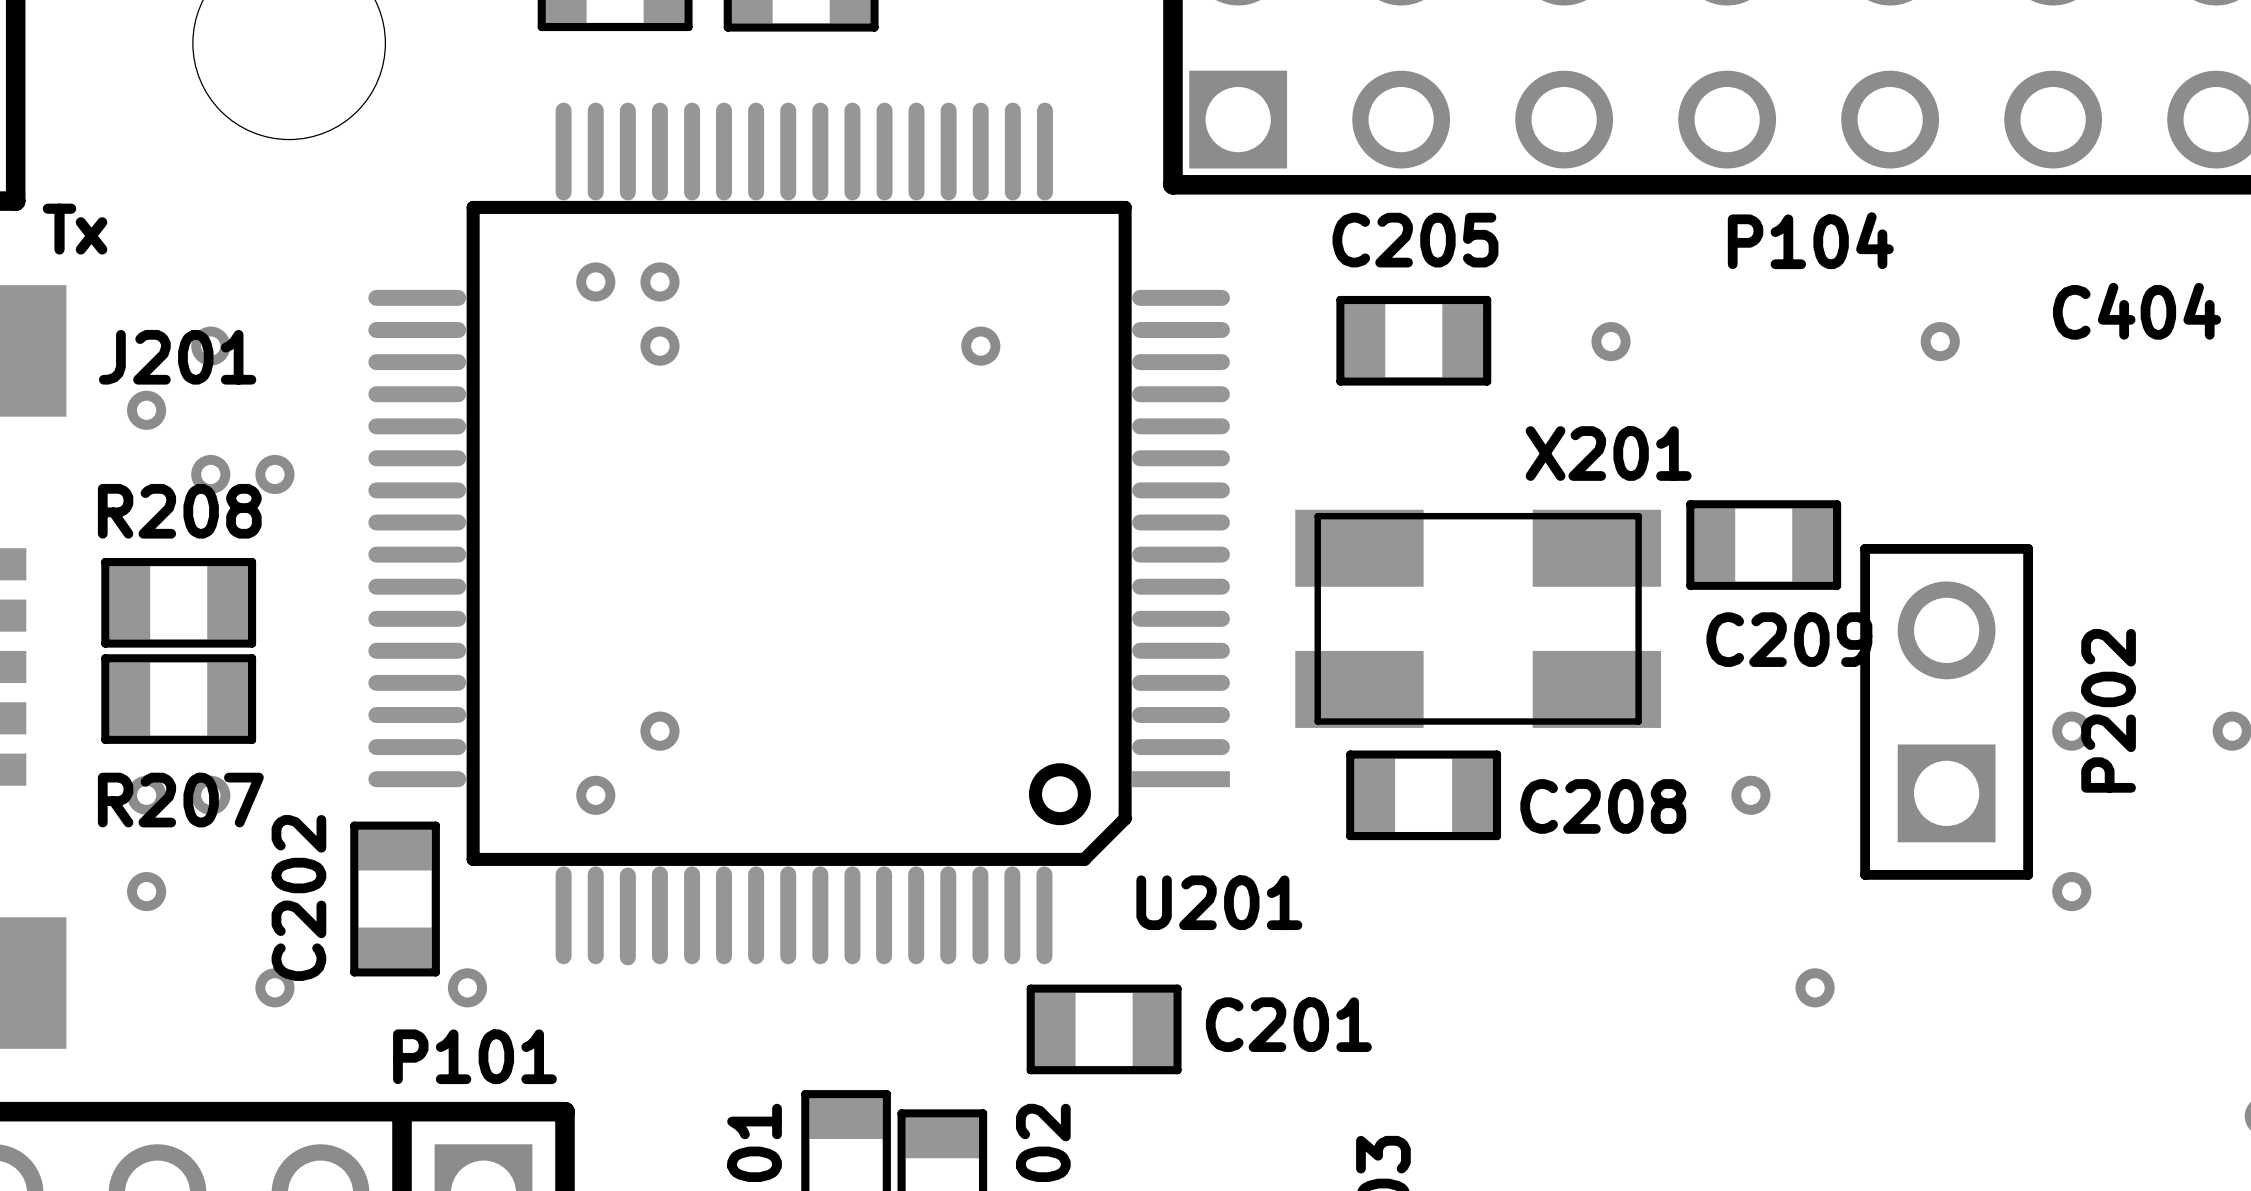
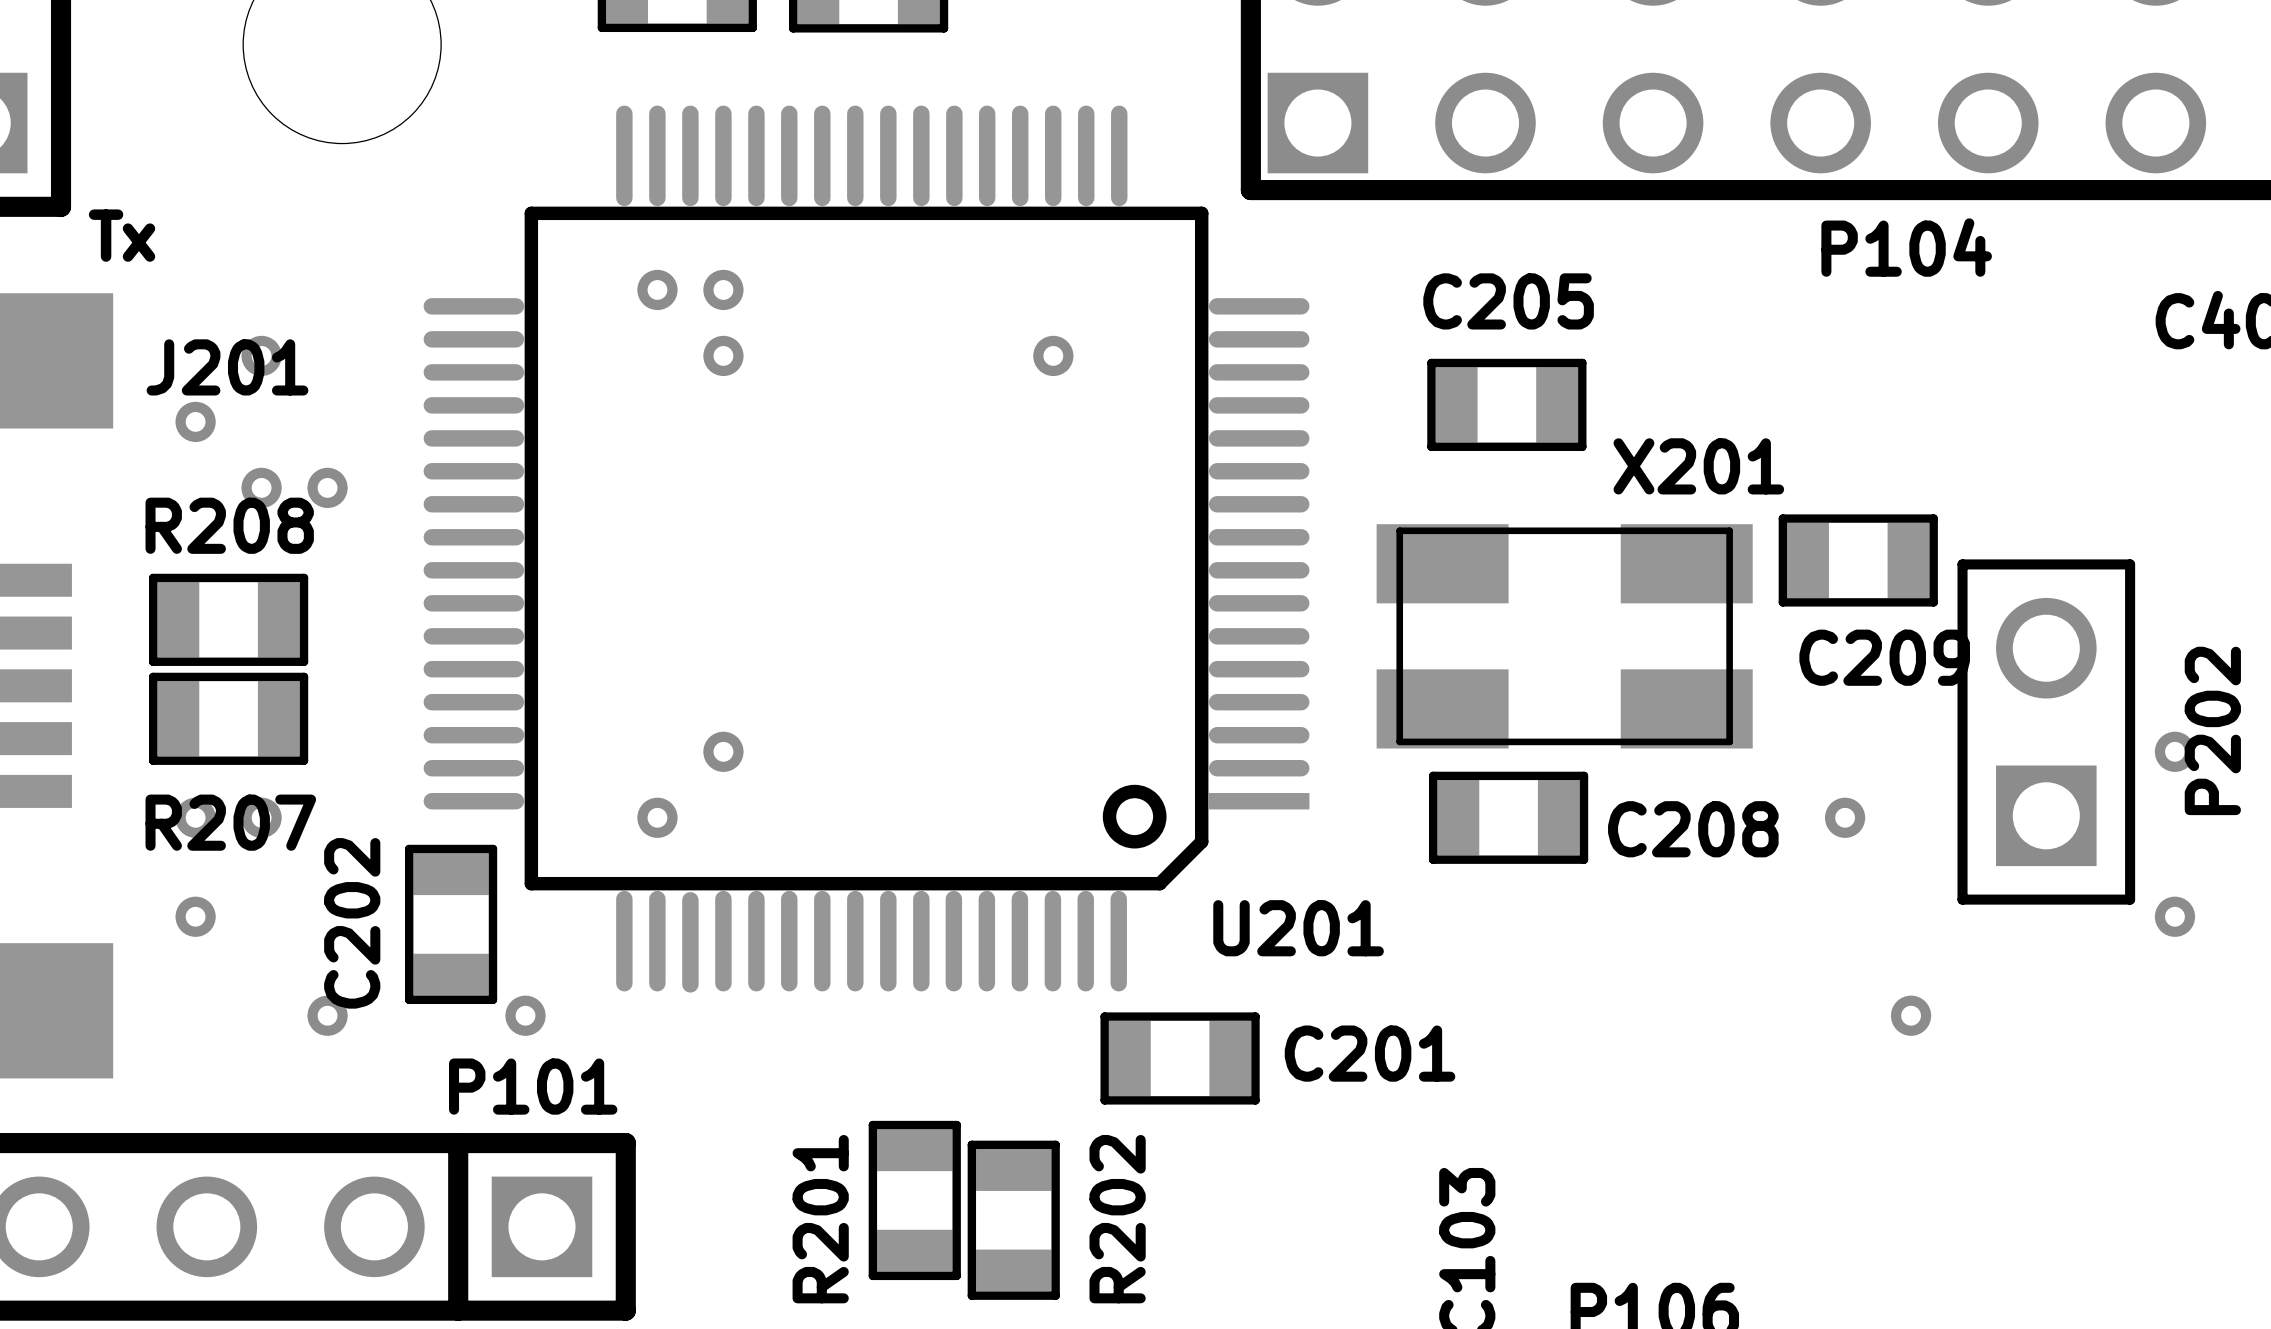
C205 position: (1413, 340) -> (1506, 404)
part: (1611, 341) -> none
part: (1940, 341) -> none

